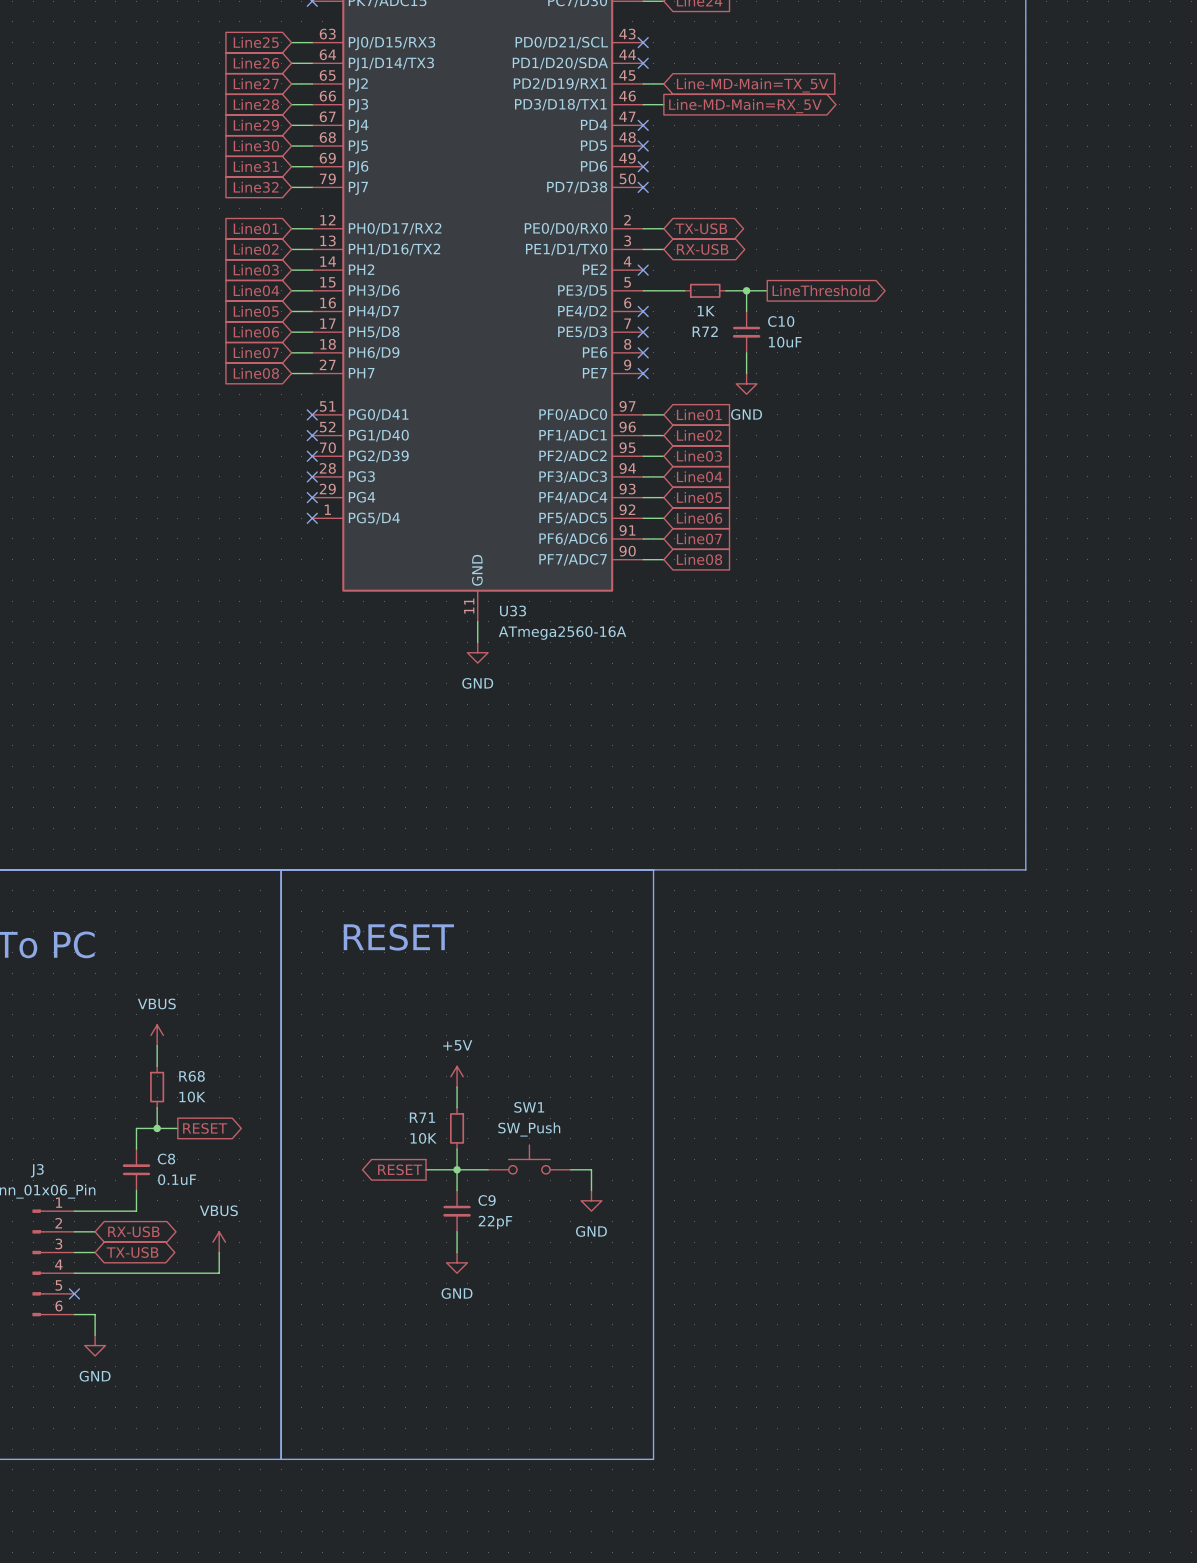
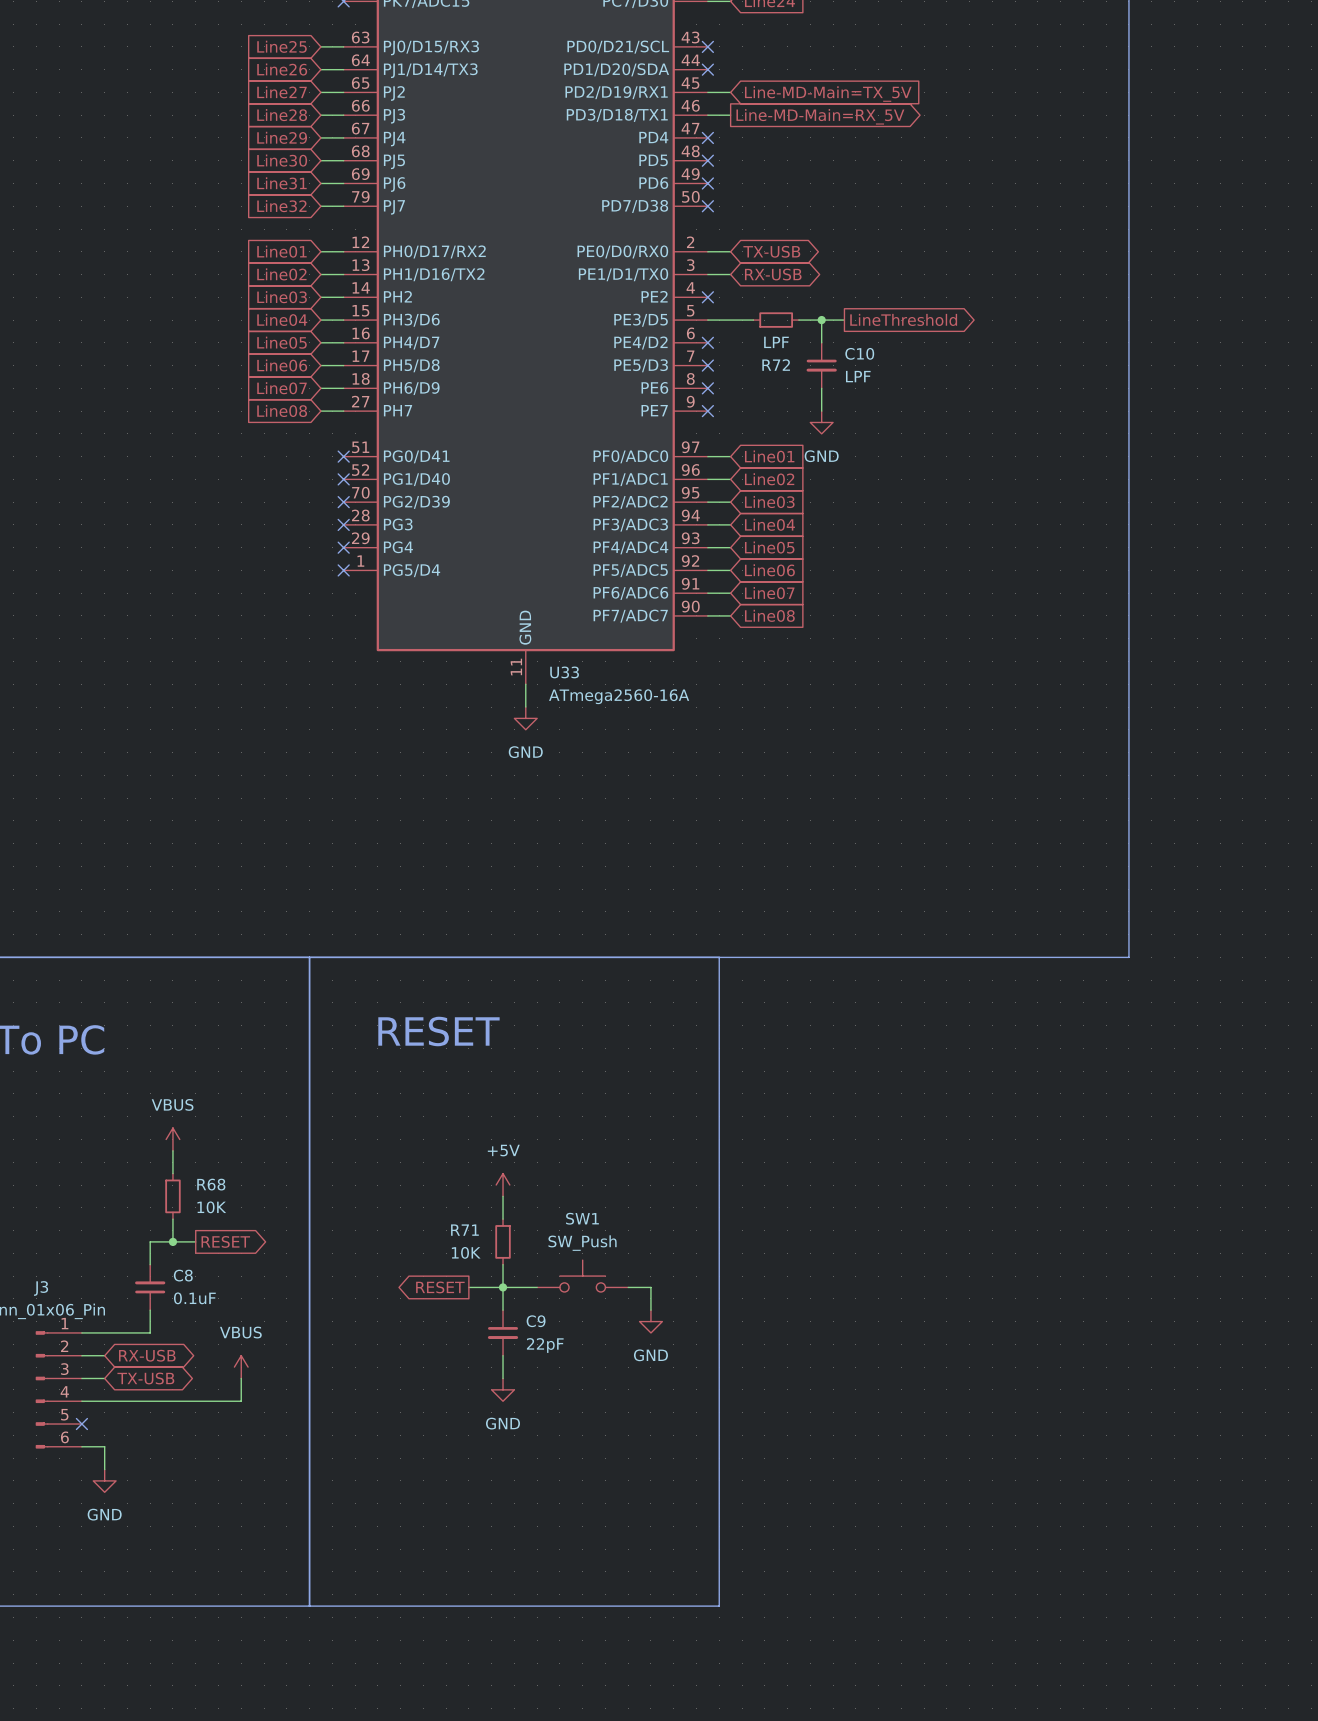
R72 value: 1K (706, 311) -> LPF (776, 342)
C10 value: 10uF (785, 342) -> LPF (858, 376)

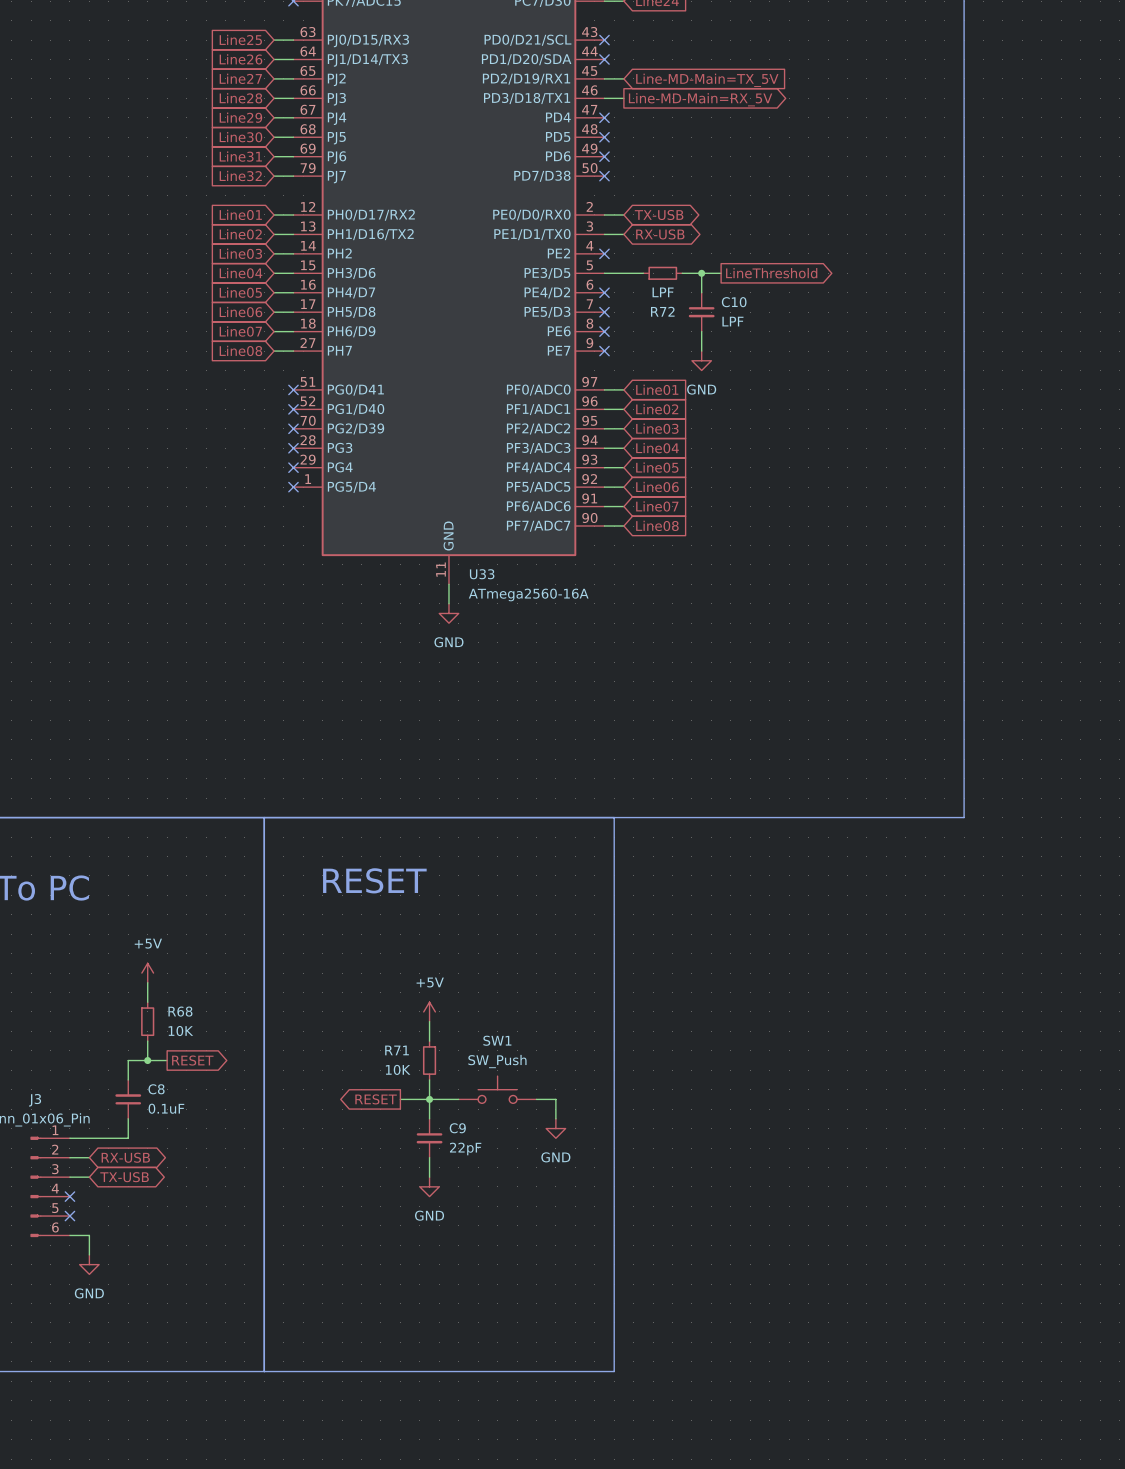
power symbol: VBUS (172, 1139) -> +5V (147, 973)
power symbol: VBUS (241, 1367) -> none
wire: (241, 1378) (241, 1401) (81, 1401) -> none
no-connect mark: none -> (69, 1196)

